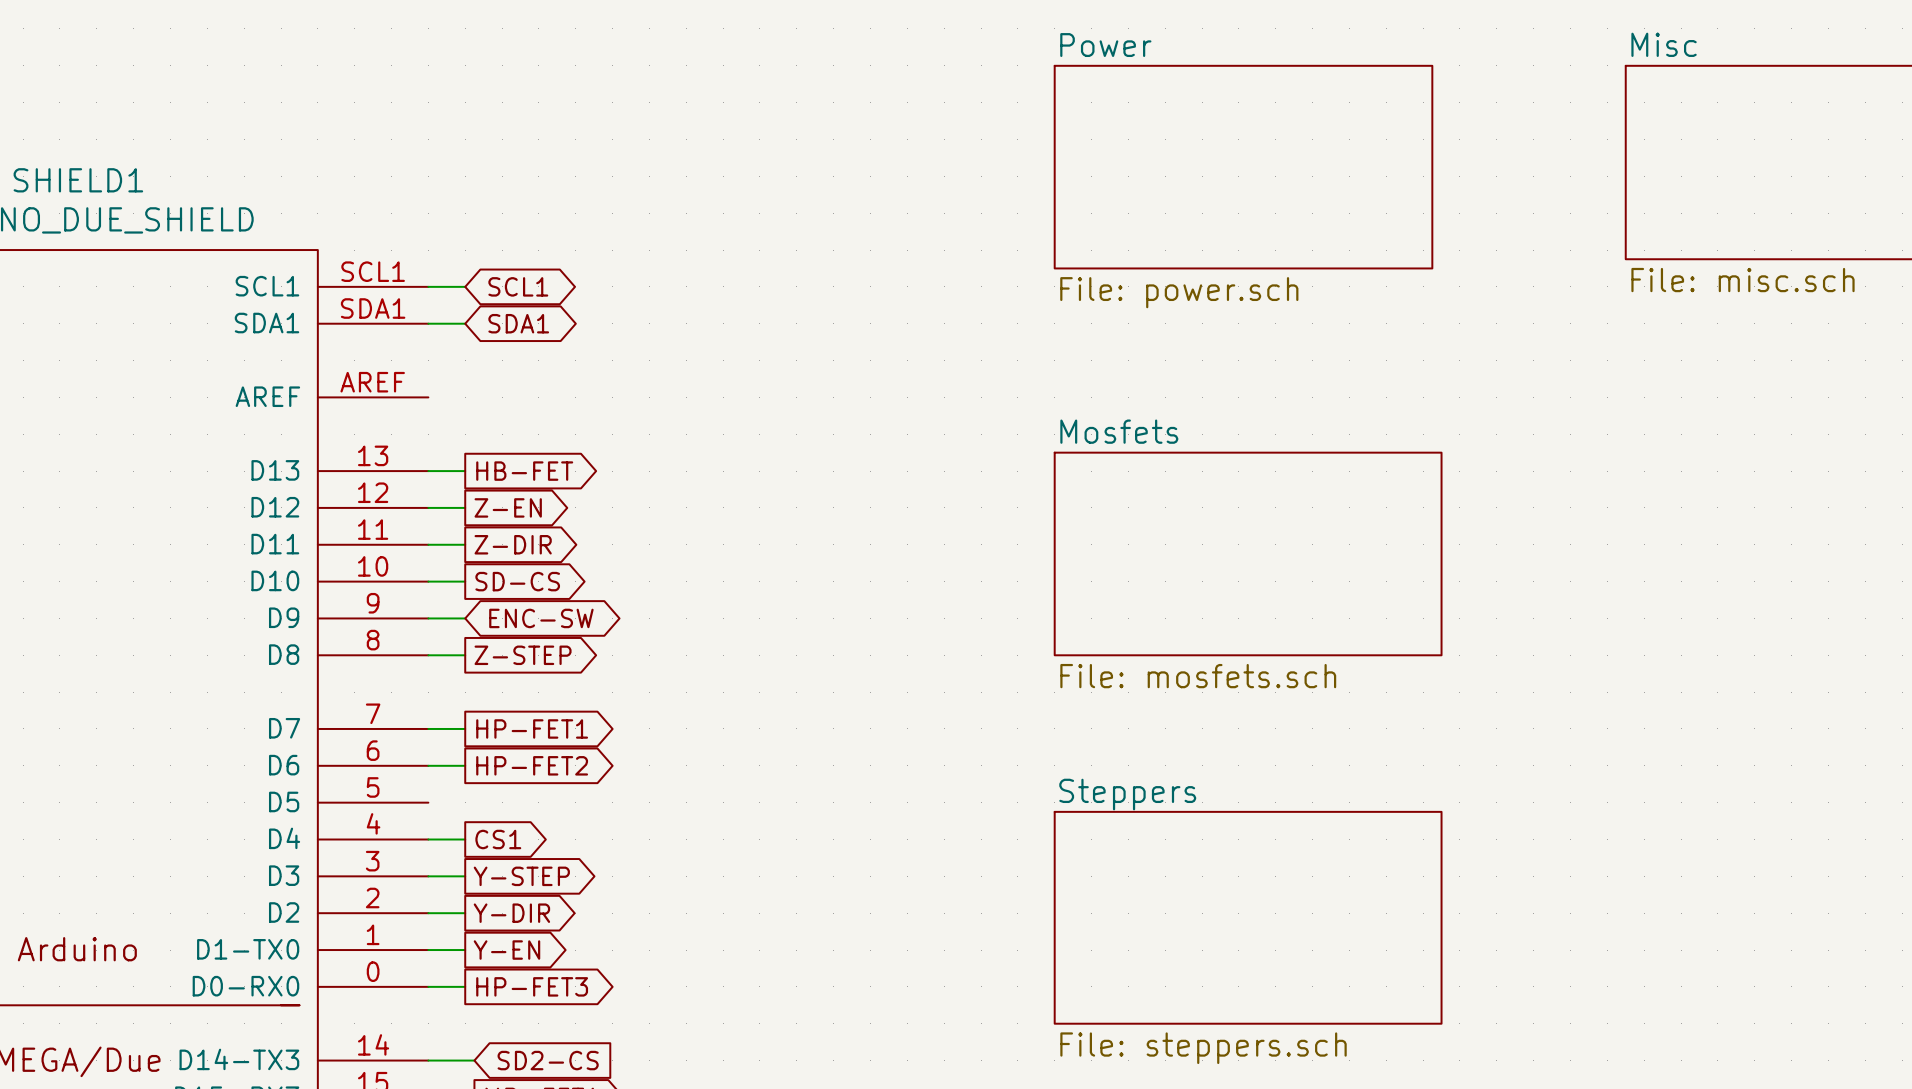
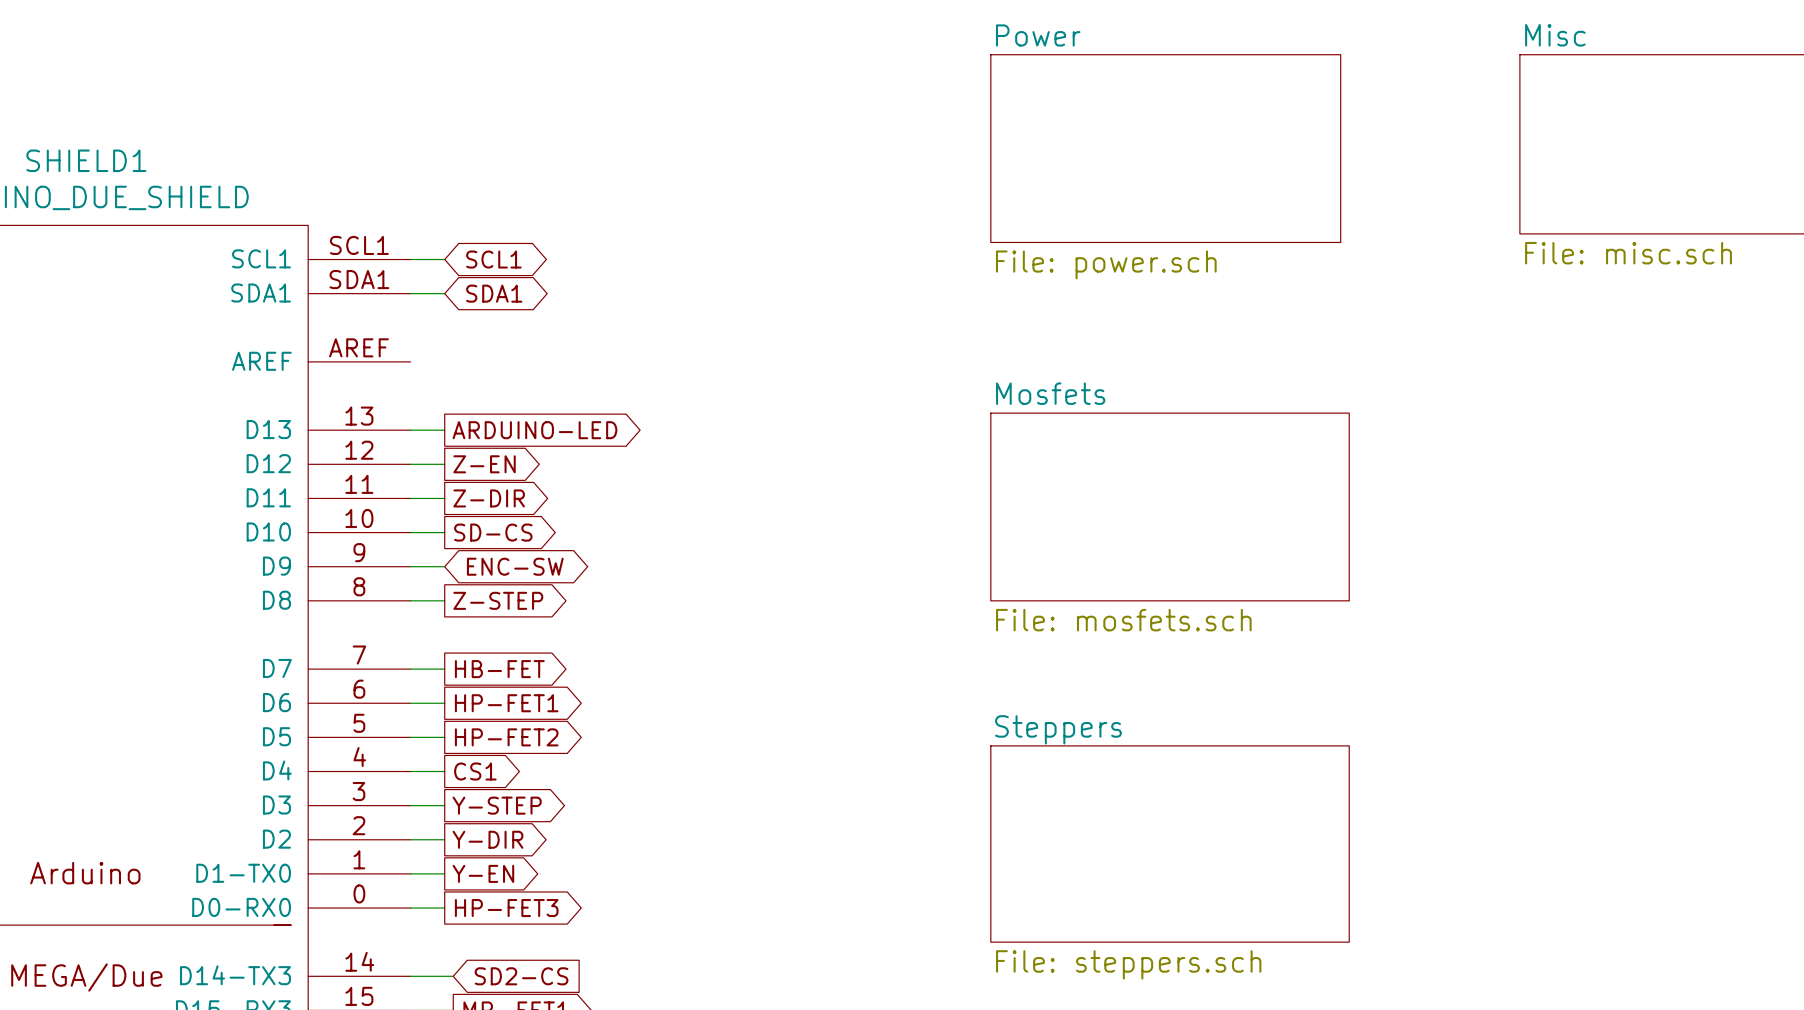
global label: HB-FET (524, 471) -> ARDUINO-LED (534, 430)
global label: HP-FET1 (532, 728) -> HB-FET (499, 669)
global label: HP-FET2 (532, 765) -> HP-FET1 (506, 703)
wire: none -> (410, 737) (444, 737)
global label: none -> HP-FET2 (506, 737)

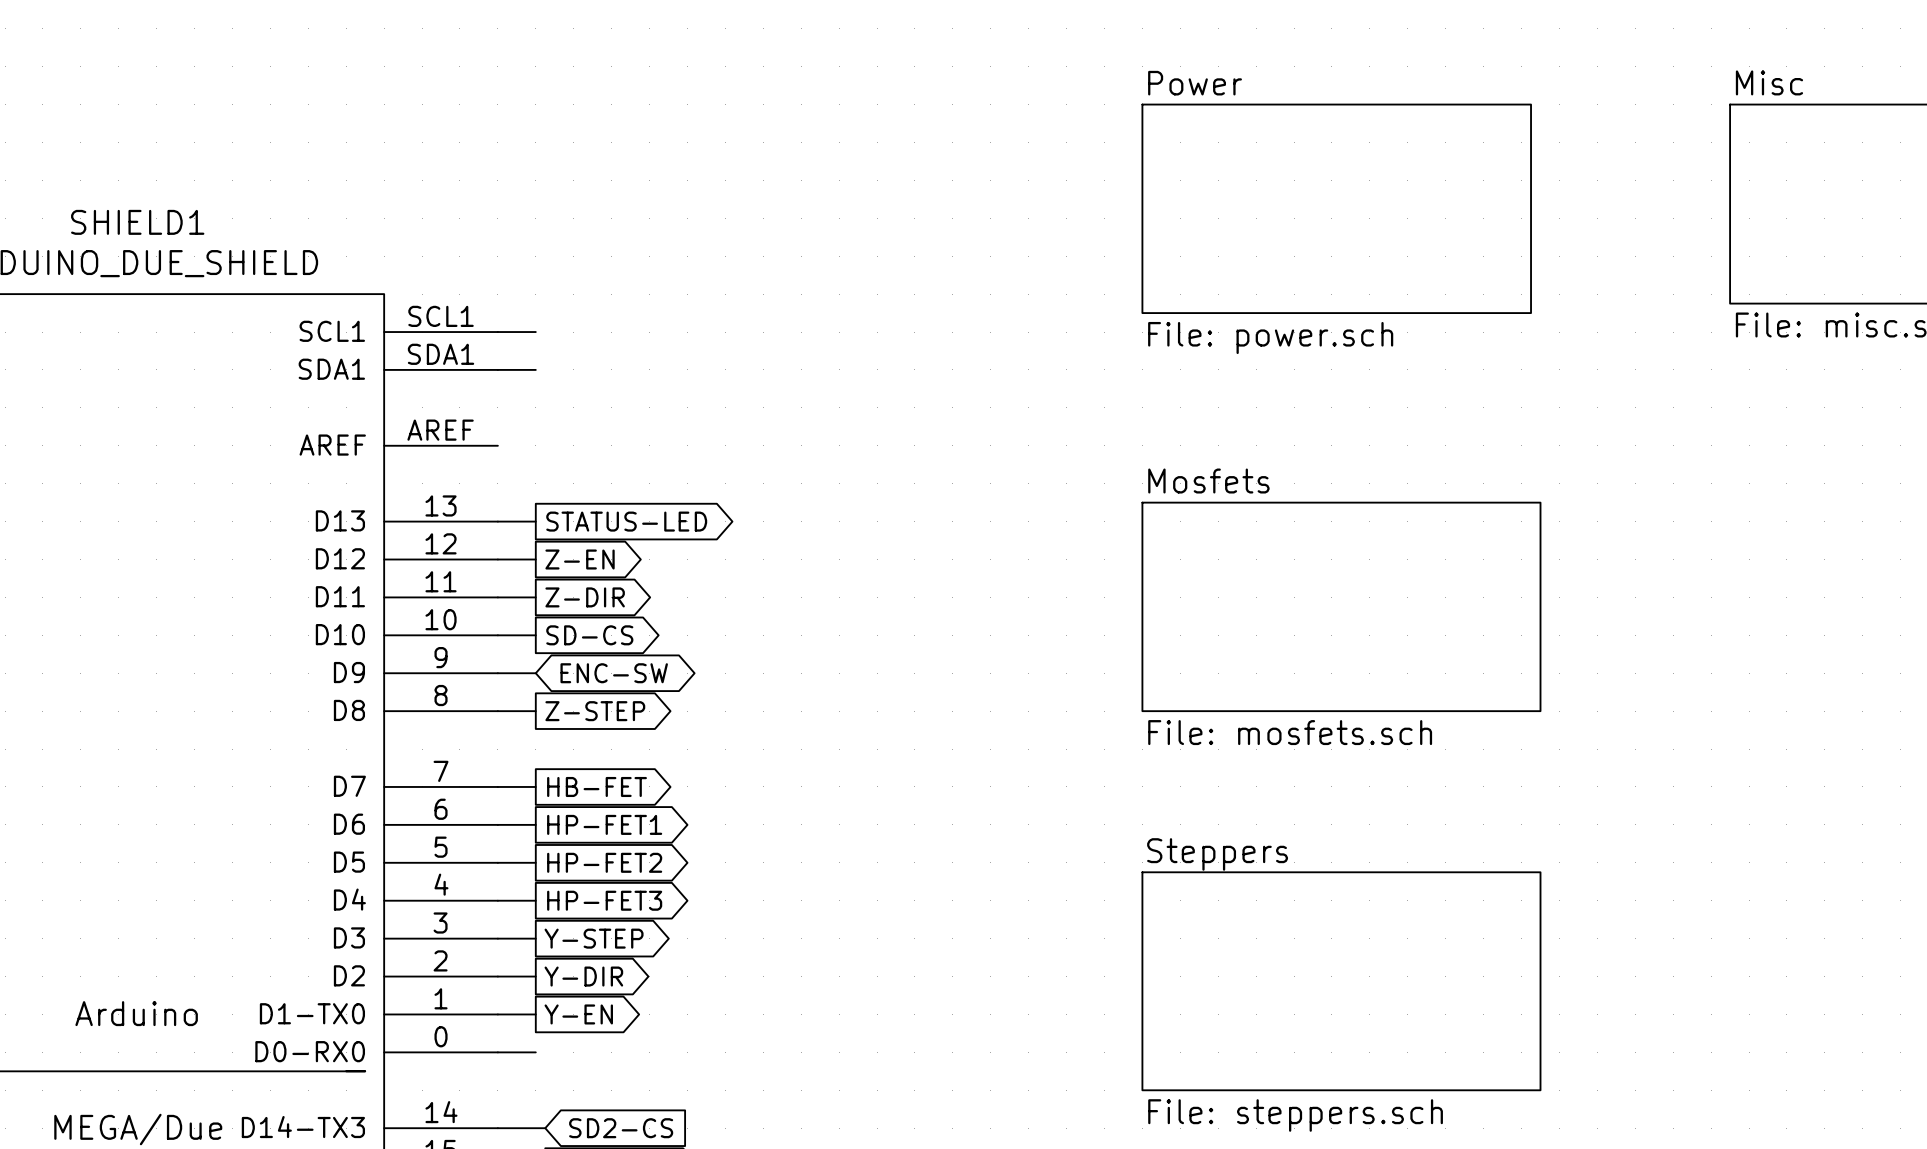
global label: SCL1 (493, 259) -> none
global label: SDA1 (494, 293) -> none
global label: ARDUINO-LED (534, 430) -> STATUS-LED (626, 521)
global label: CS1 (475, 771) -> HP-FET3 (604, 900)
global label: HP-FET3 (506, 908) -> none

